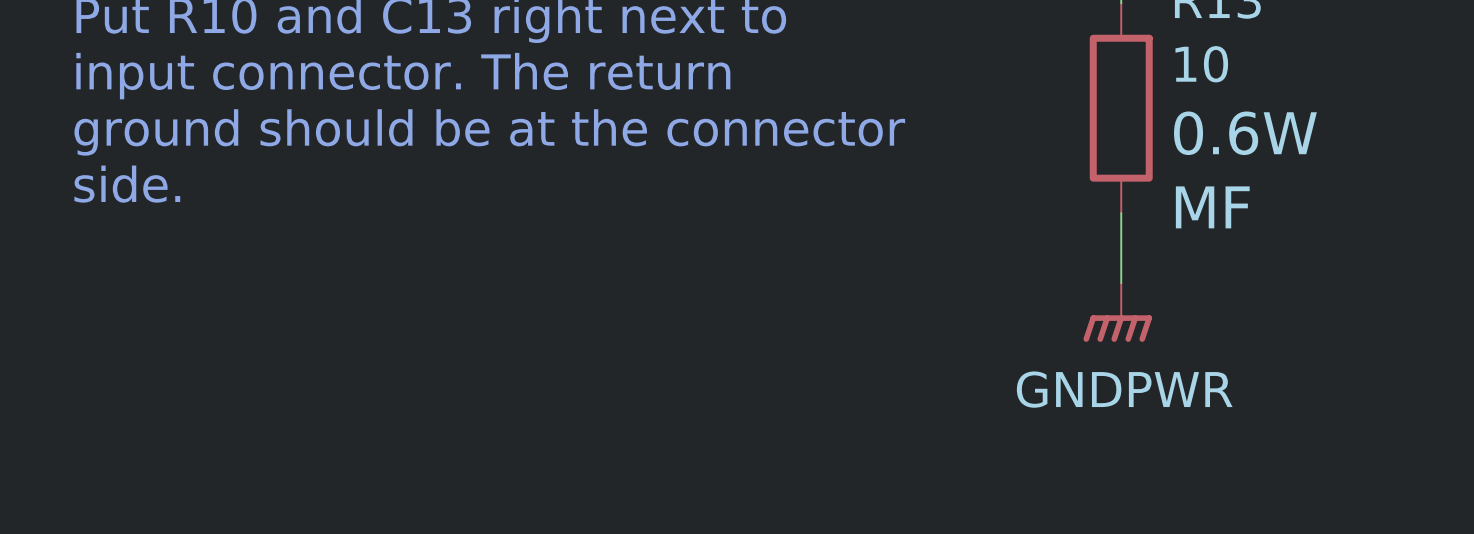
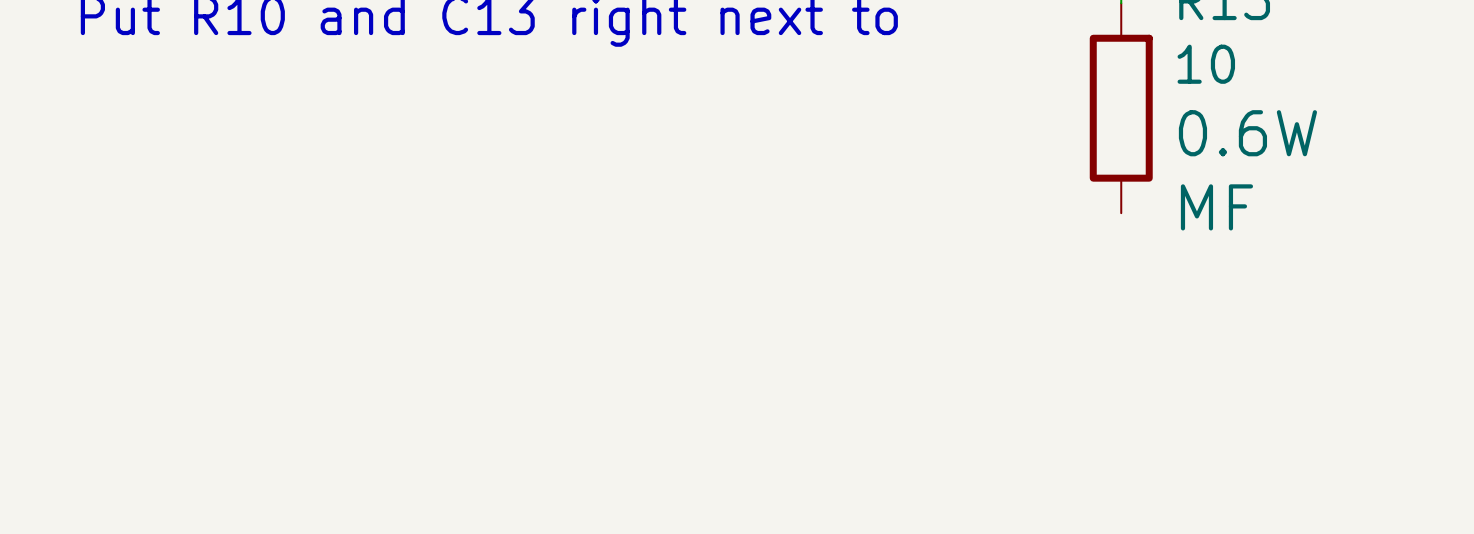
text: input connector. The return (403, 76) -> none
text: ground should be at the connector (489, 132) -> none
text: side. (127, 184) -> none
wire: (1121, 213) (1121, 283) -> none
power symbol: GNDPWR (1117, 312) -> none

